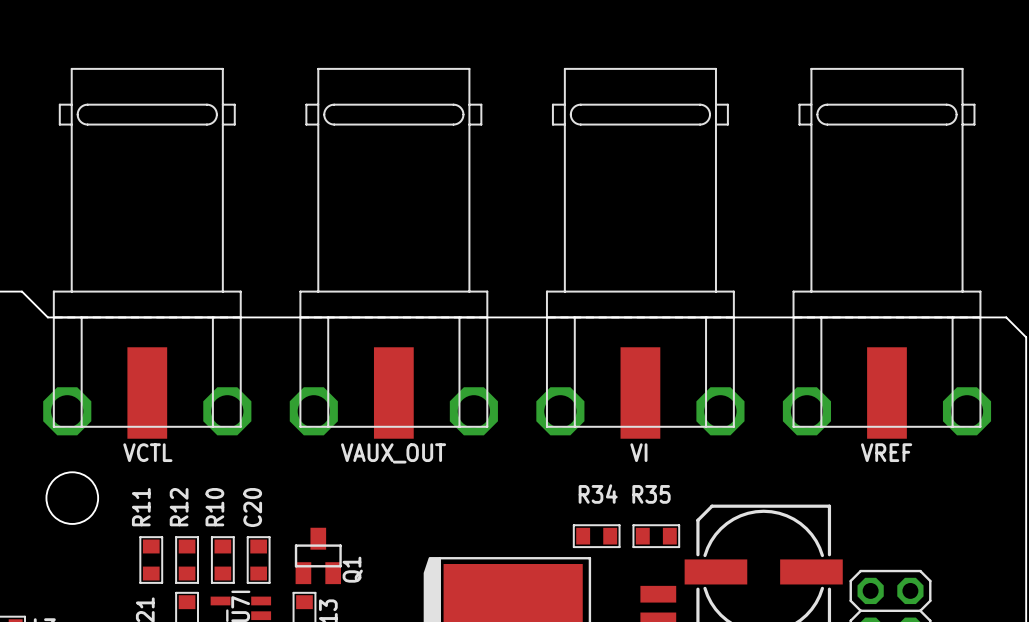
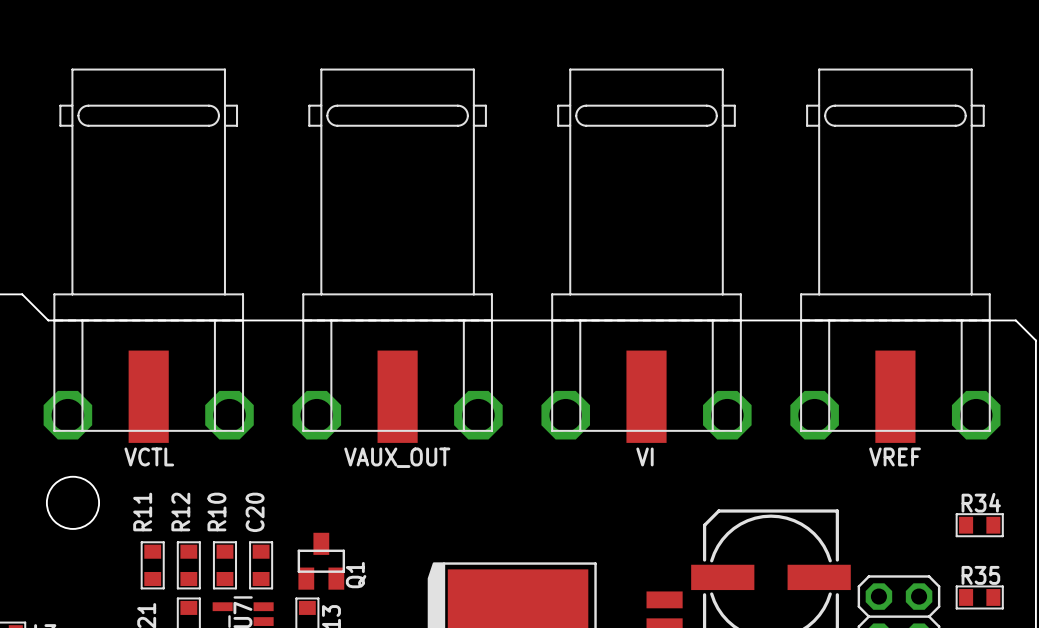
R34 name position: R34 (598, 494) -> R34 (981, 502)
R35 name position: R35 (651, 494) -> R35 (980, 575)
R34 position: (596, 536) -> (979, 525)
R35 position: (656, 536) -> (979, 597)

